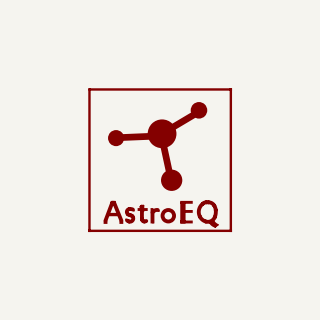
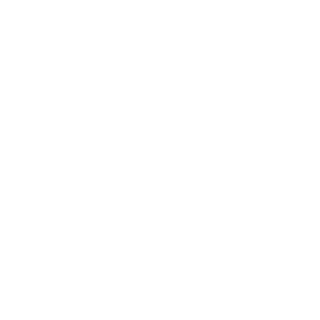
part: (160, 160) -> none

